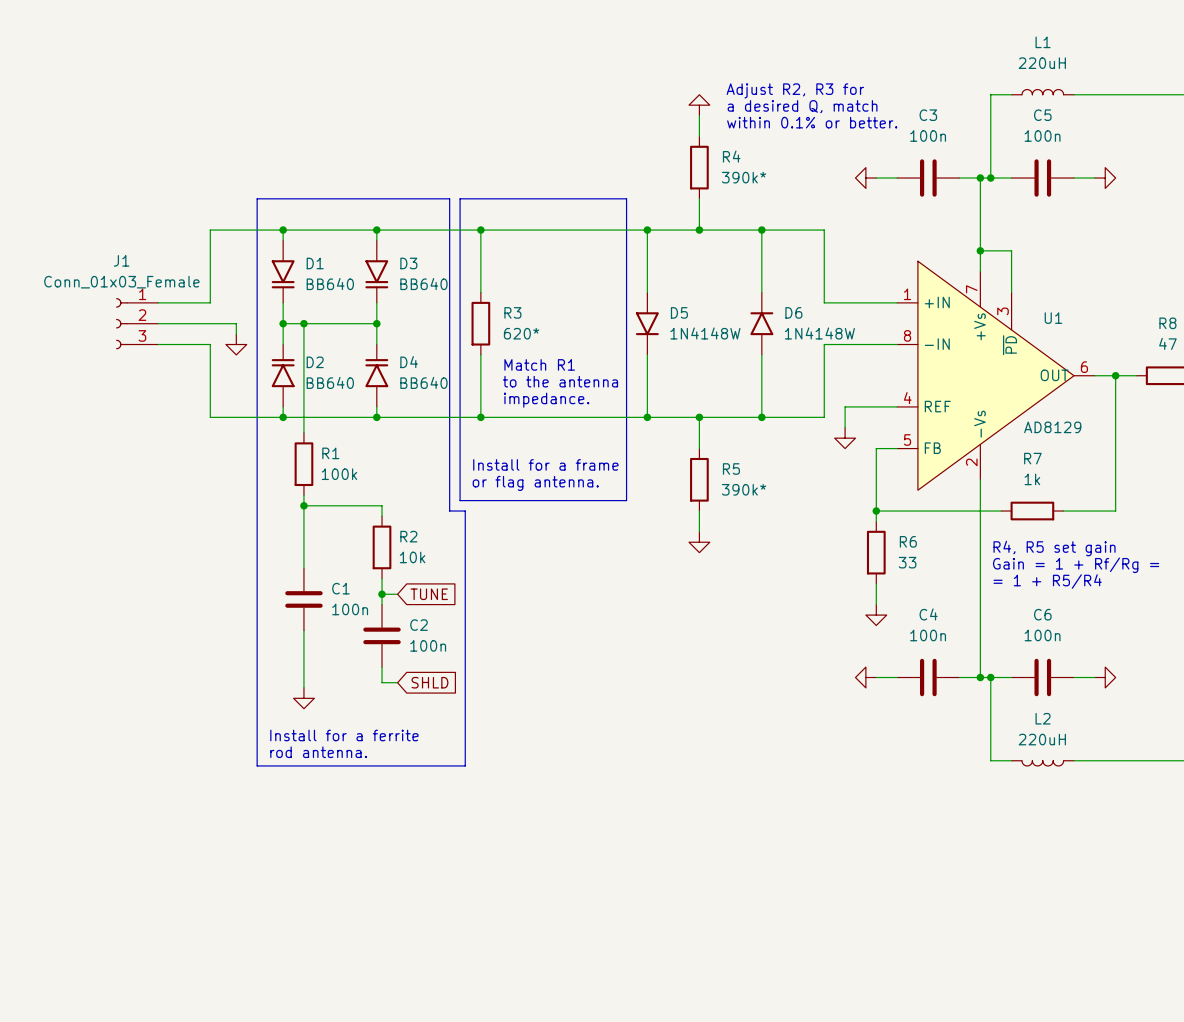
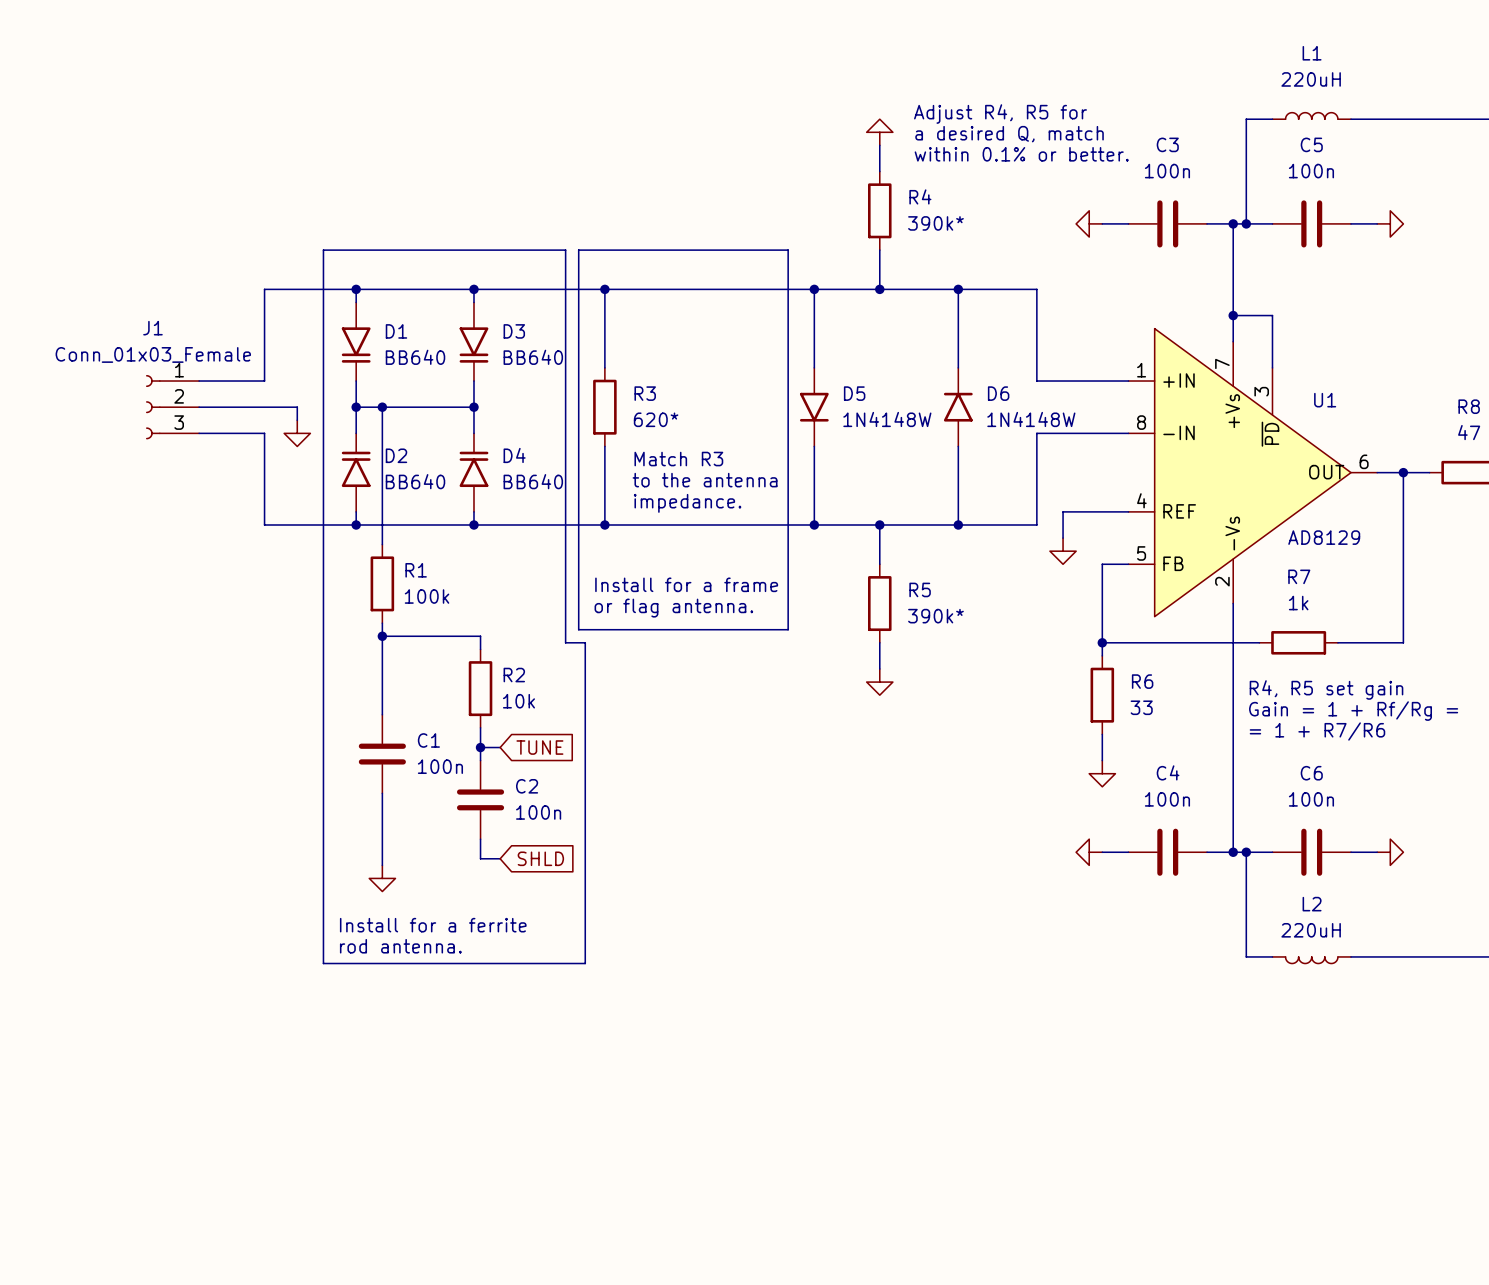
text: Adjust R2, R3 for (795, 90) -> Adjust R4, R5 for (1000, 114)
text: Match R1 (539, 364) -> Match R3 (678, 459)
text: = 1 + R5/R4 (1047, 581) -> = 1 + R7/R6 (1317, 731)

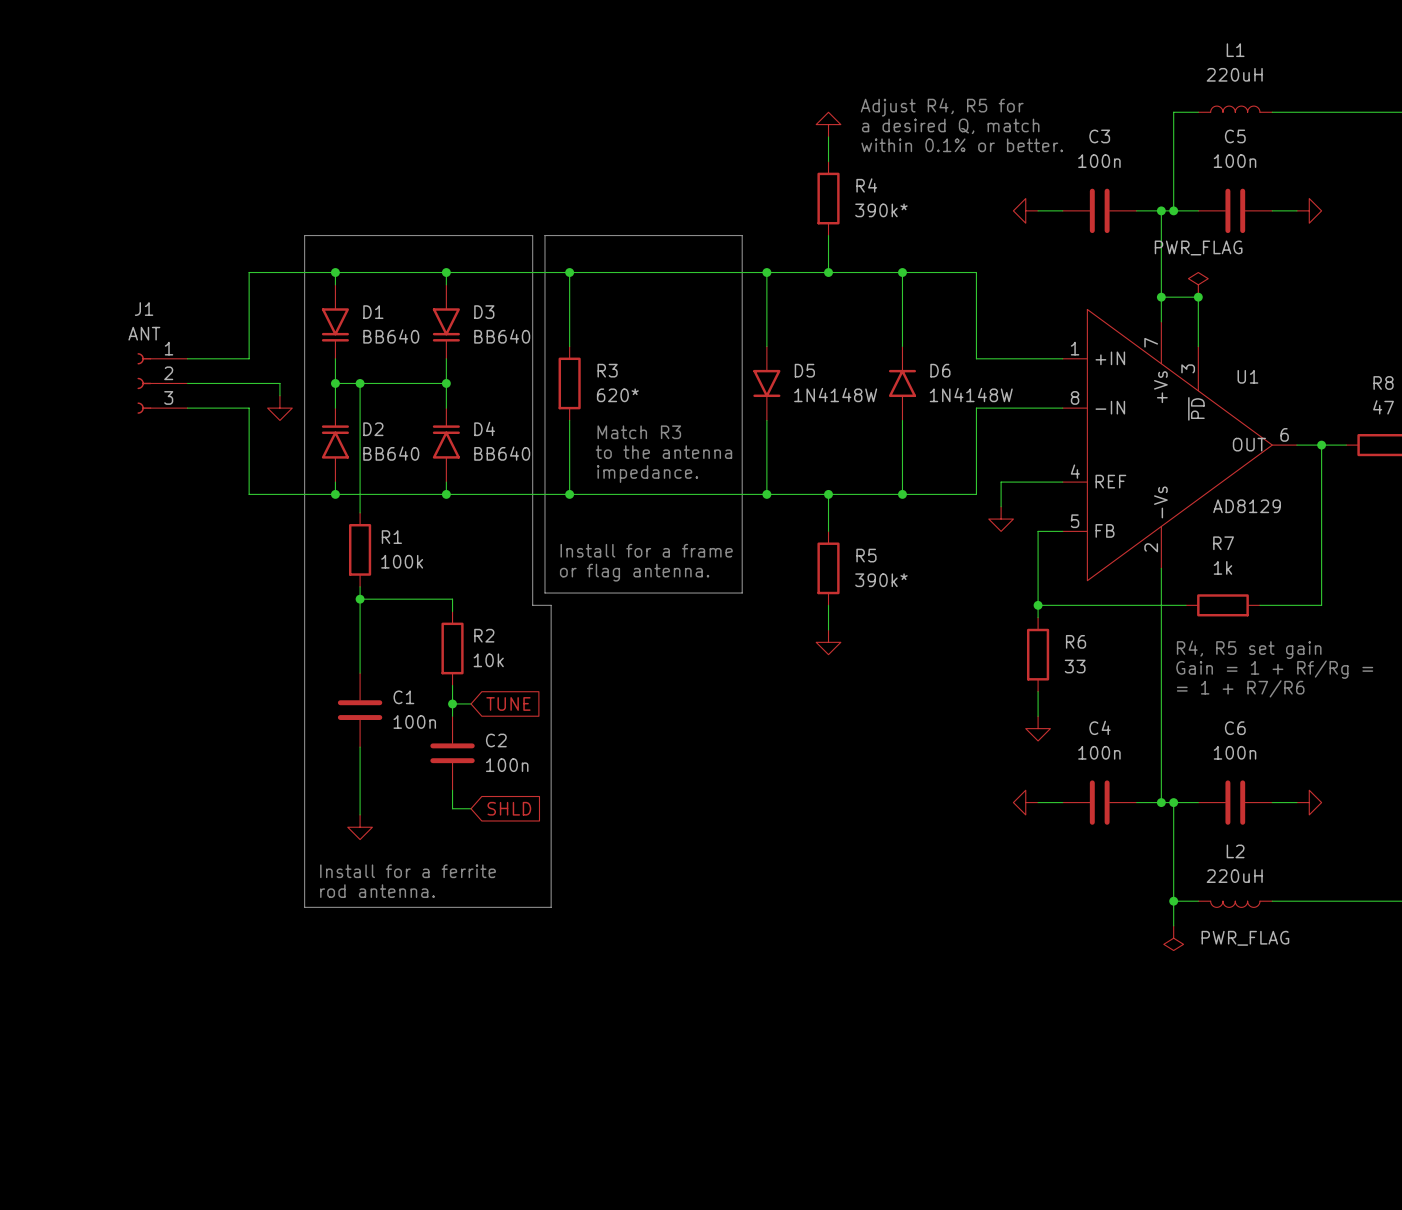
power symbol: none -> PWR_FLAG (1198, 284)
junction: none -> (1198, 297)
J1 value: Conn_01x03_Female (153, 354) -> ANT (144, 333)
wire: none -> (1173, 901) (1173, 925)
junction: none -> (1173, 901)
power symbol: none -> PWR_FLAG (1173, 938)

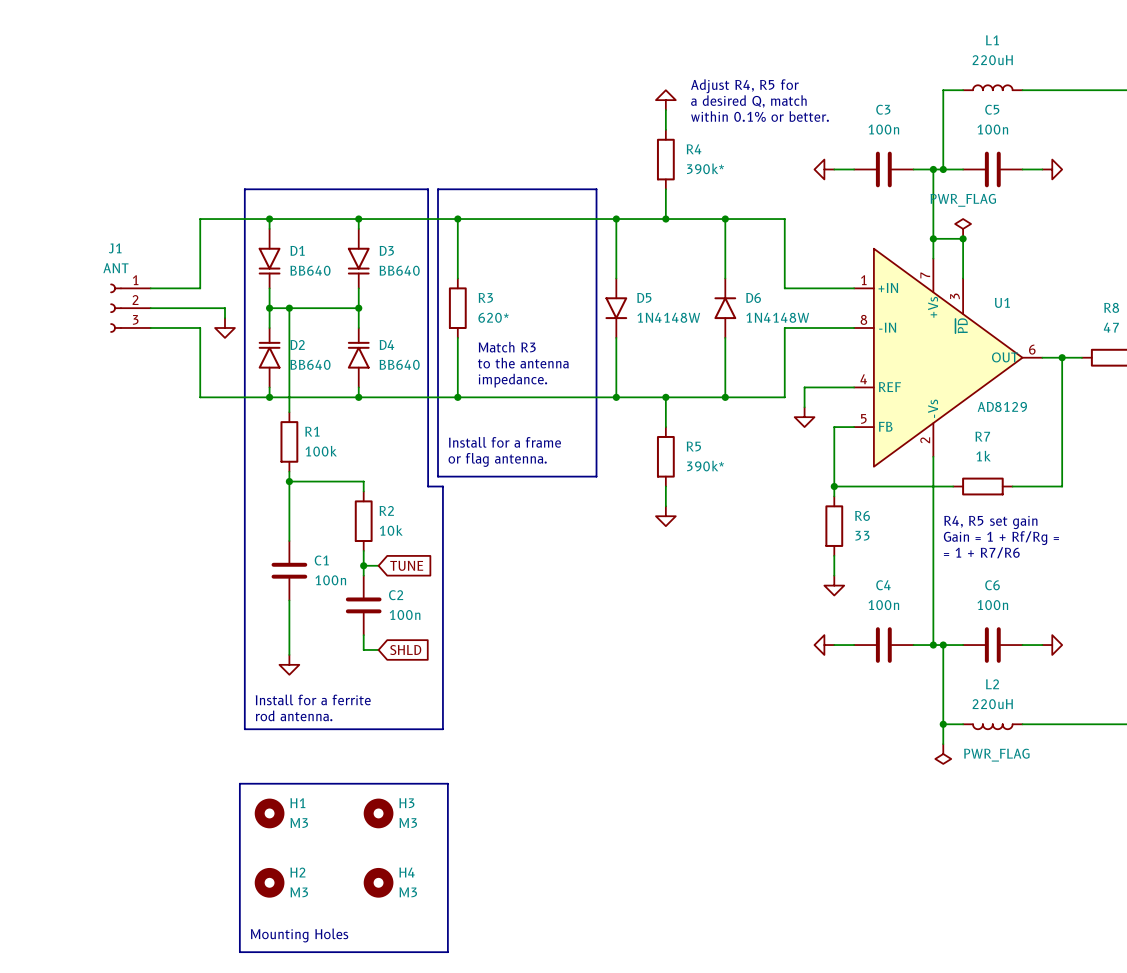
line: none -> (239, 783) (447, 783) (447, 952) (239, 952) (239, 783)
H1: none -> M3 (269, 813)
H3: none -> M3 (378, 813)
H2: none -> M3 (269, 882)
H4: none -> M3 (378, 882)
text: none -> Mounting Holes (299, 935)

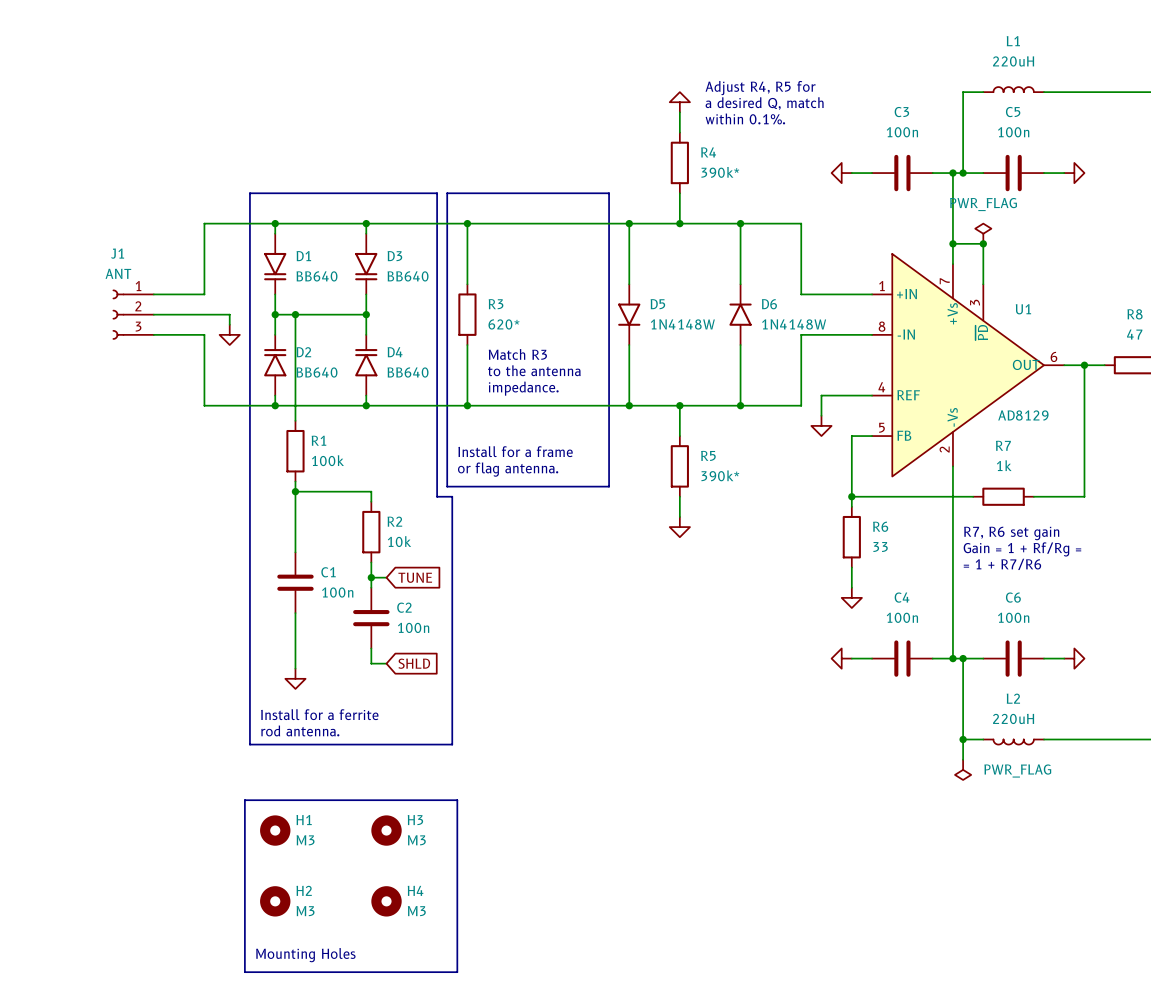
text: within 0.1% or better. (760, 116) -> within 0.1%. (745, 118)
text: R4, R5 set gain (990, 522) -> R7, R6 set gain (1011, 533)

